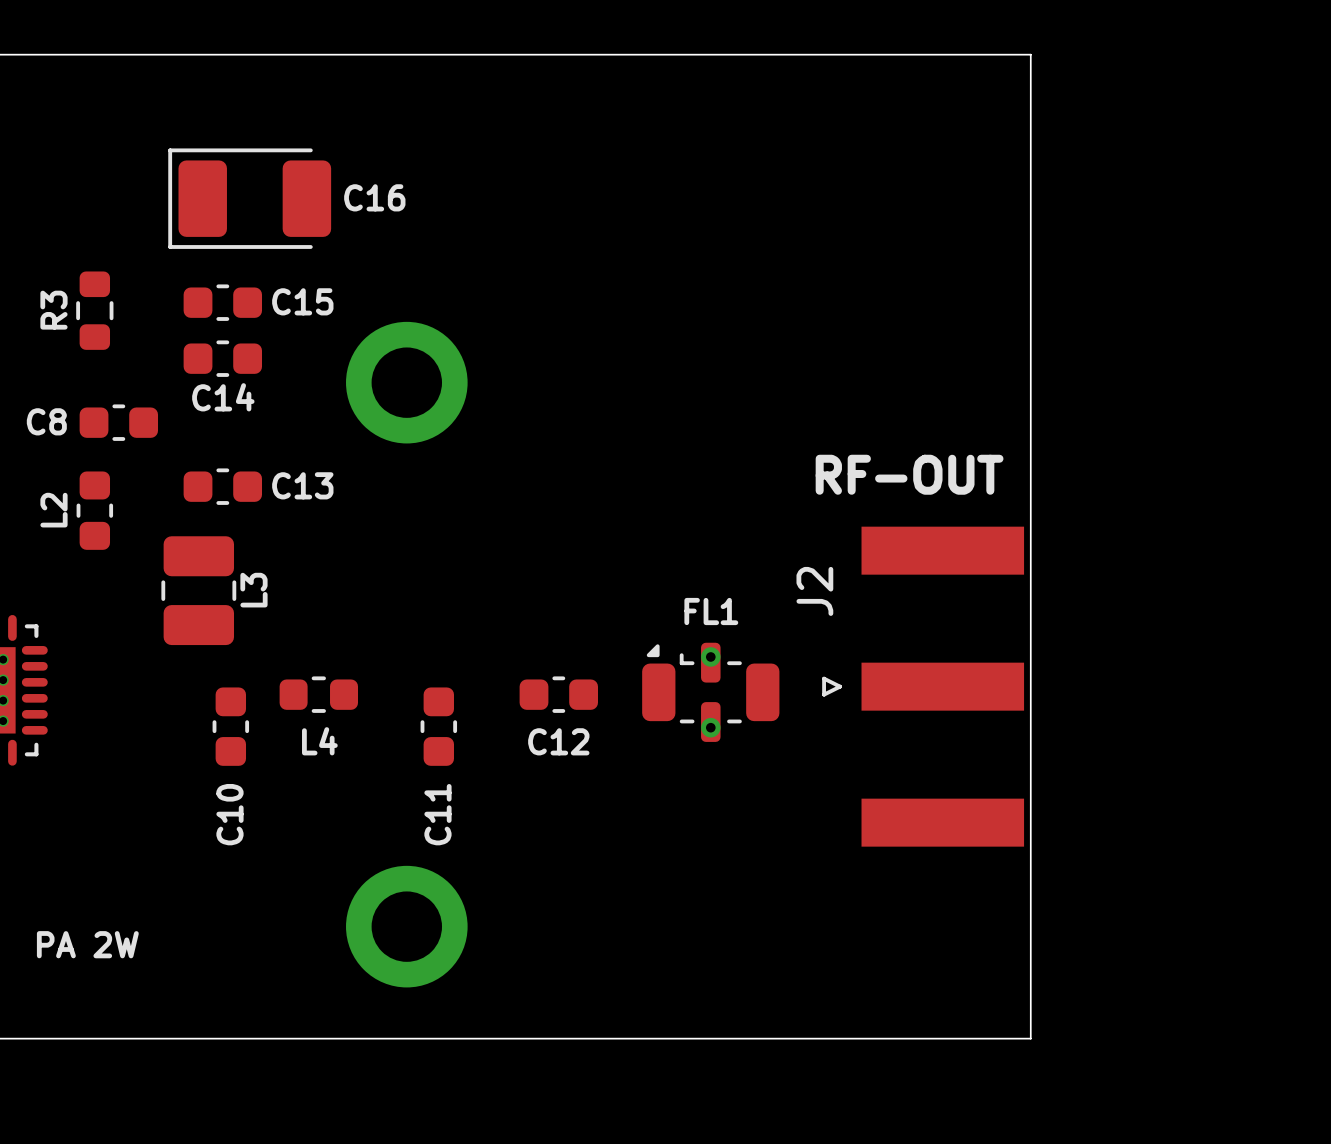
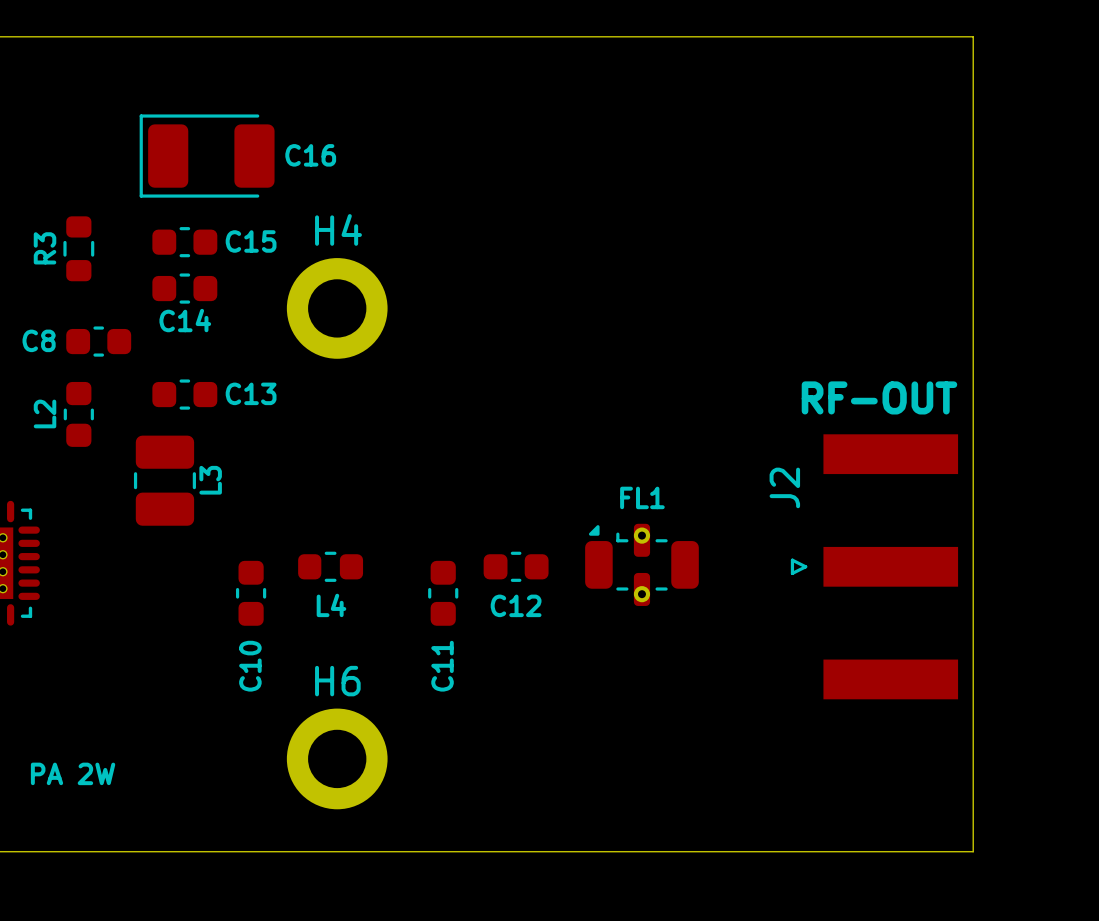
board edge: (1030, 54) (1030, 1038) -> (853, 36) (973, 36) (973, 851) (853, 851)
H4 name: none -> H4 (338, 229)
text position: RF-OUT (909, 474) -> RF-OUT (879, 397)
J2 position: (923, 686) -> (874, 566)
FL1 position: (710, 692) -> (641, 564)
L4 position: (318, 694) -> (330, 566)
C12 position: (558, 694) -> (516, 566)
C10 position: (230, 726) -> (251, 593)
C11 position: (438, 726) -> (443, 593)
H6 name: none -> H6 (337, 681)

